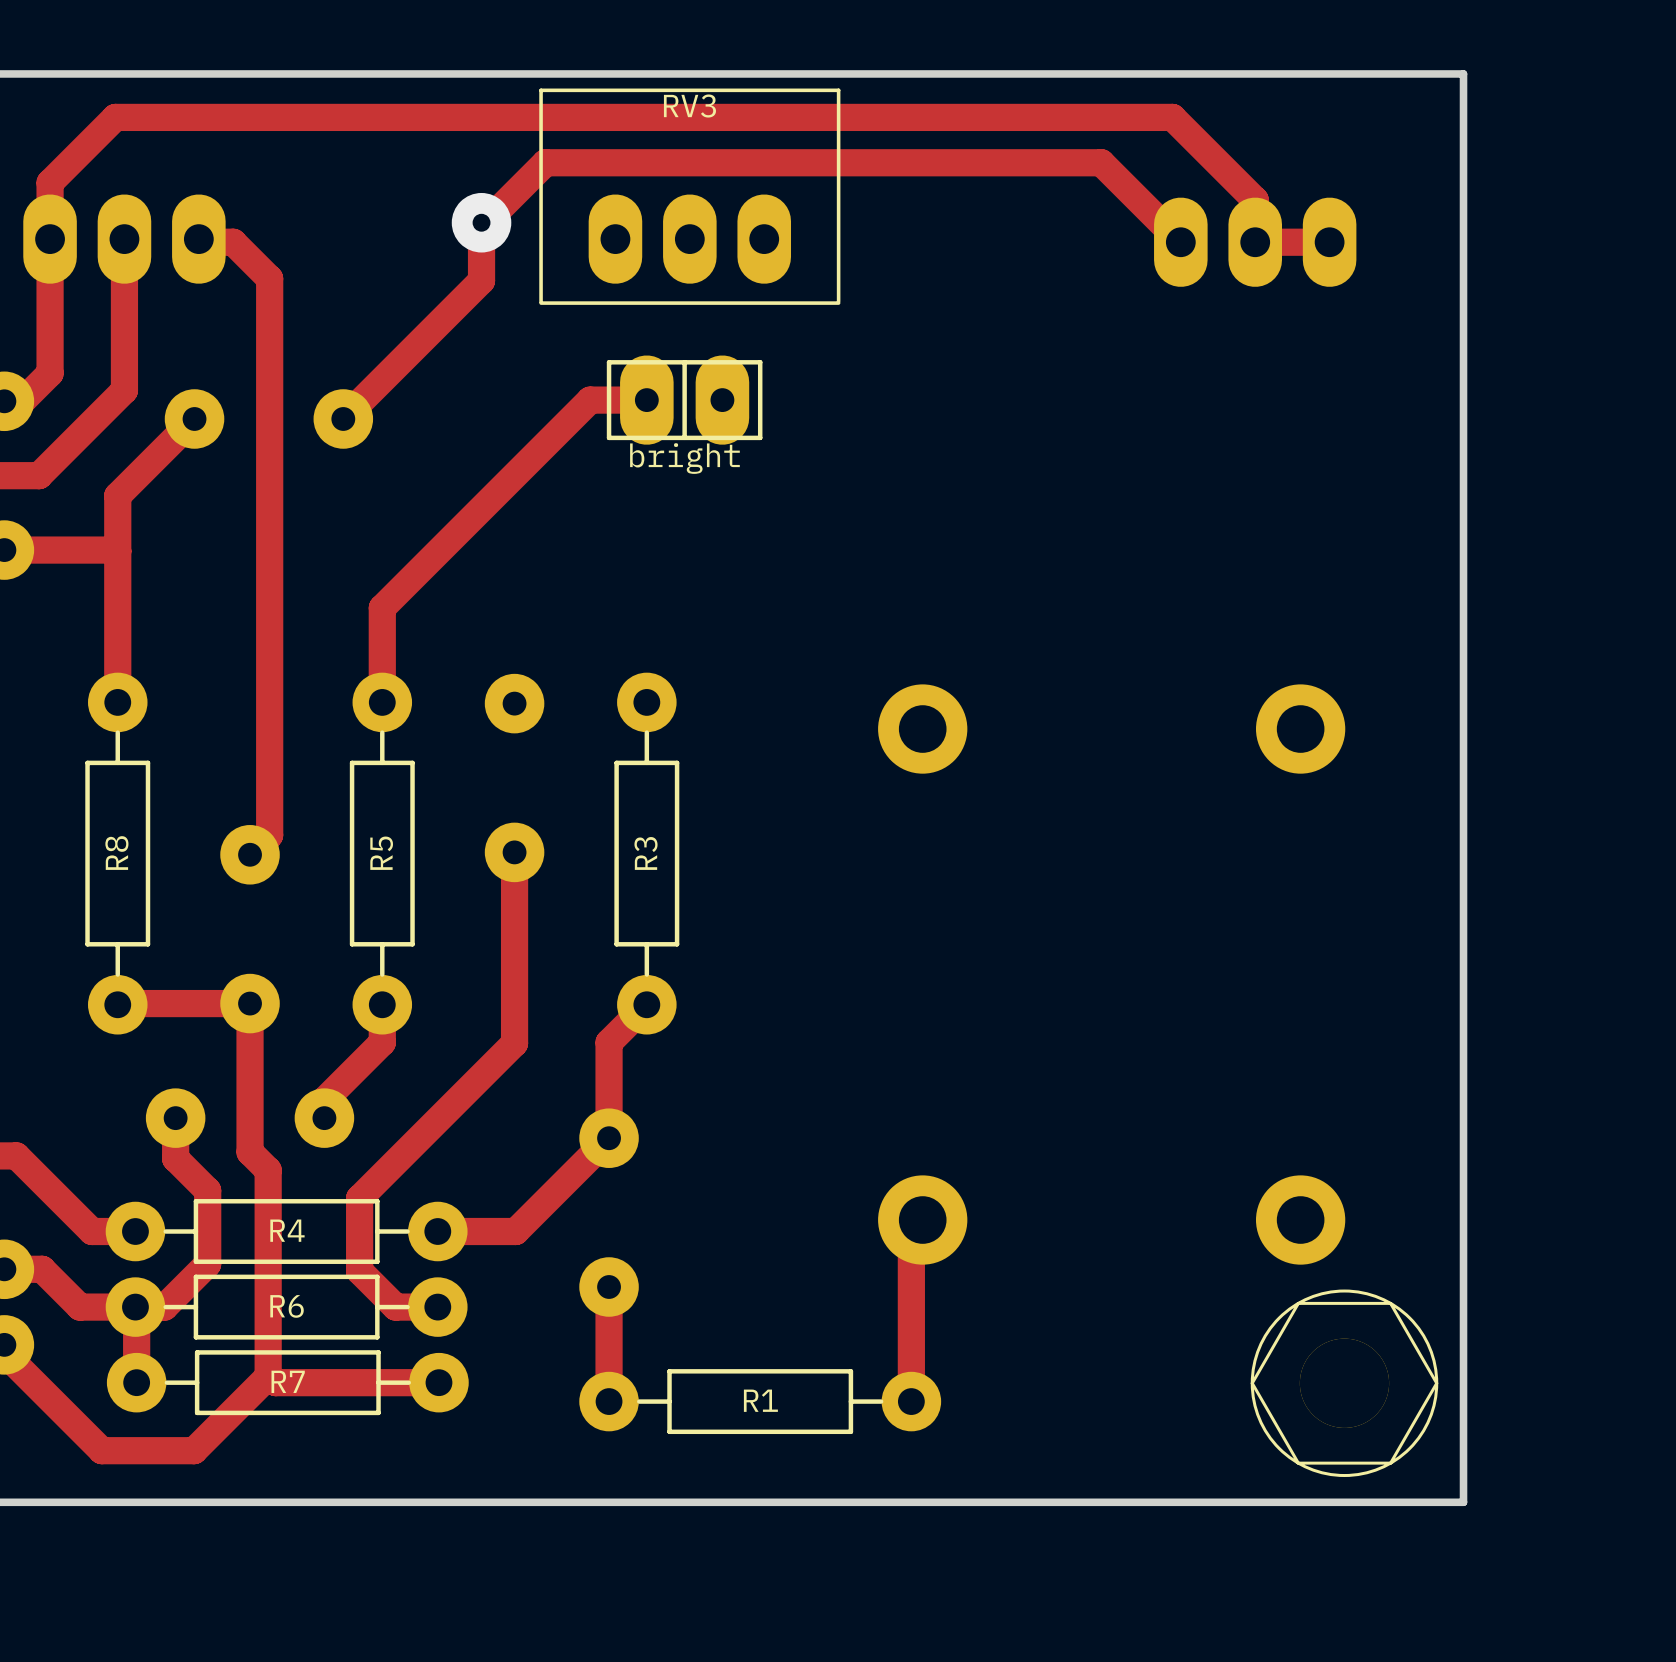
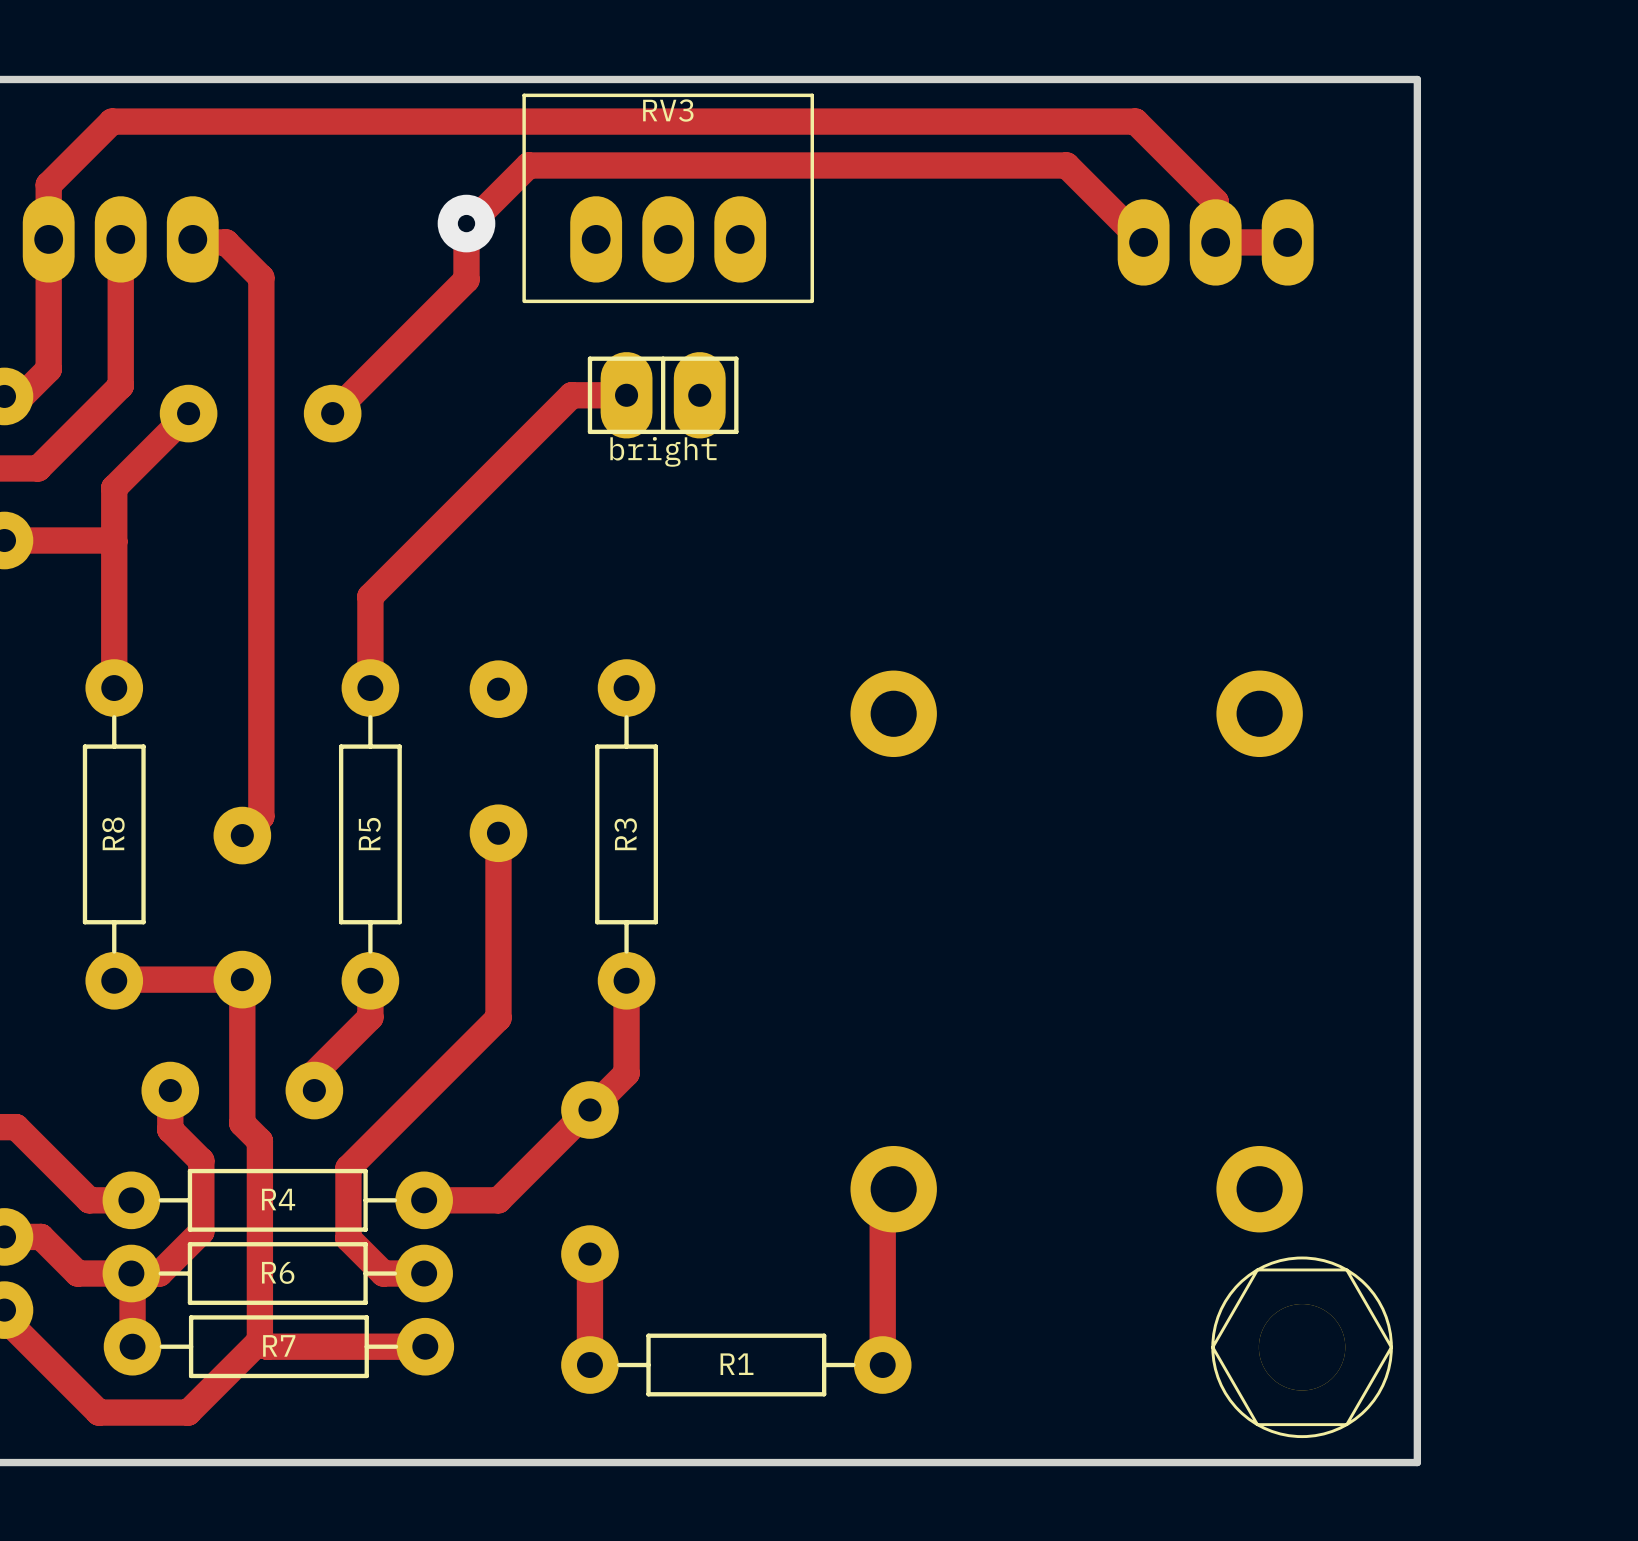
track: (646, 1004) (609, 1042) (609, 1138) (514, 1231) -> (626, 980) (626, 1073) (498, 1200)

